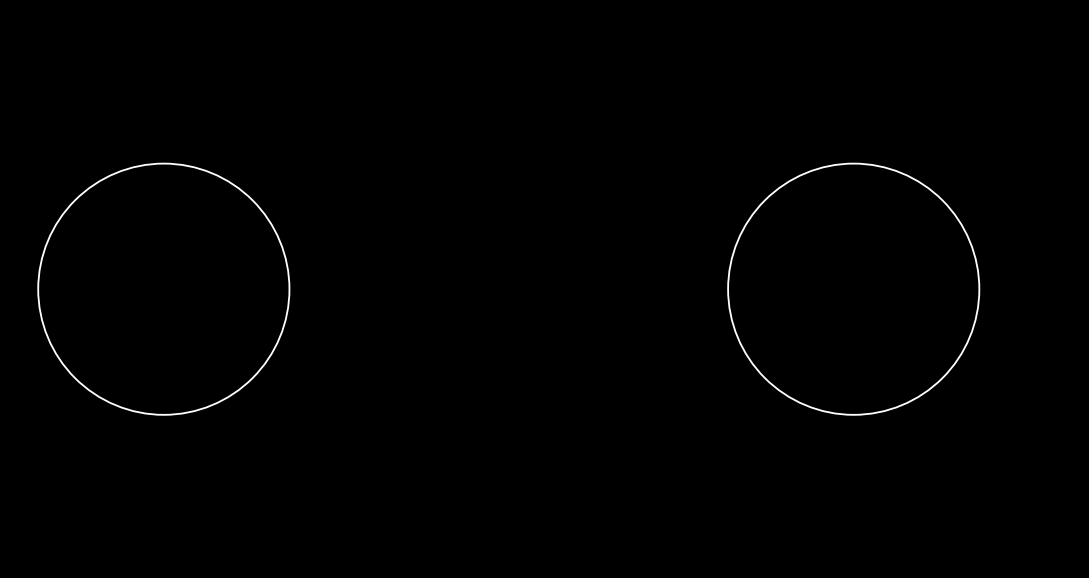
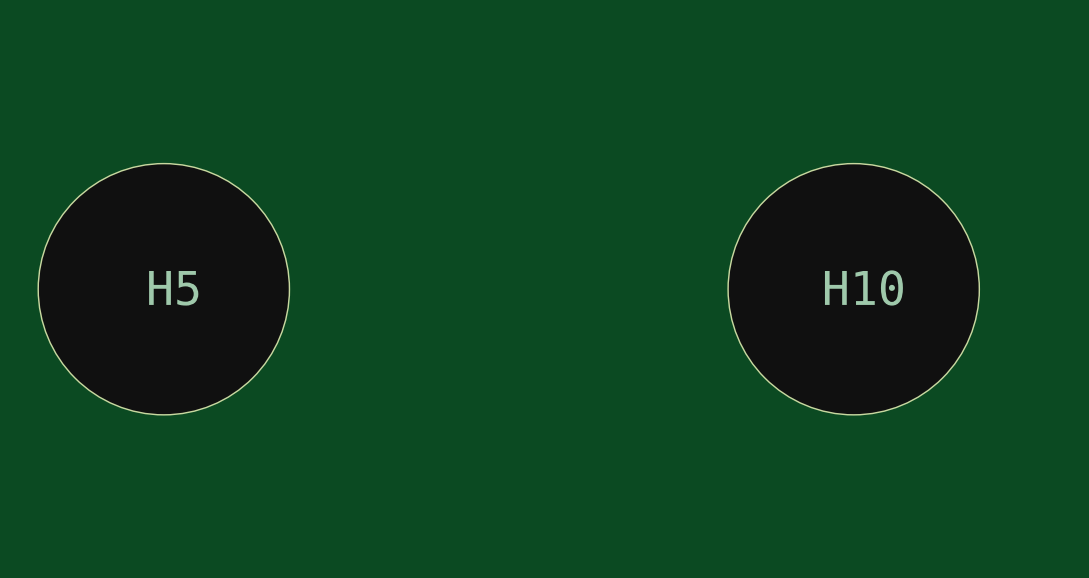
H5 name: none -> H5 (173, 288)
H10 name: none -> H10 (863, 287)

